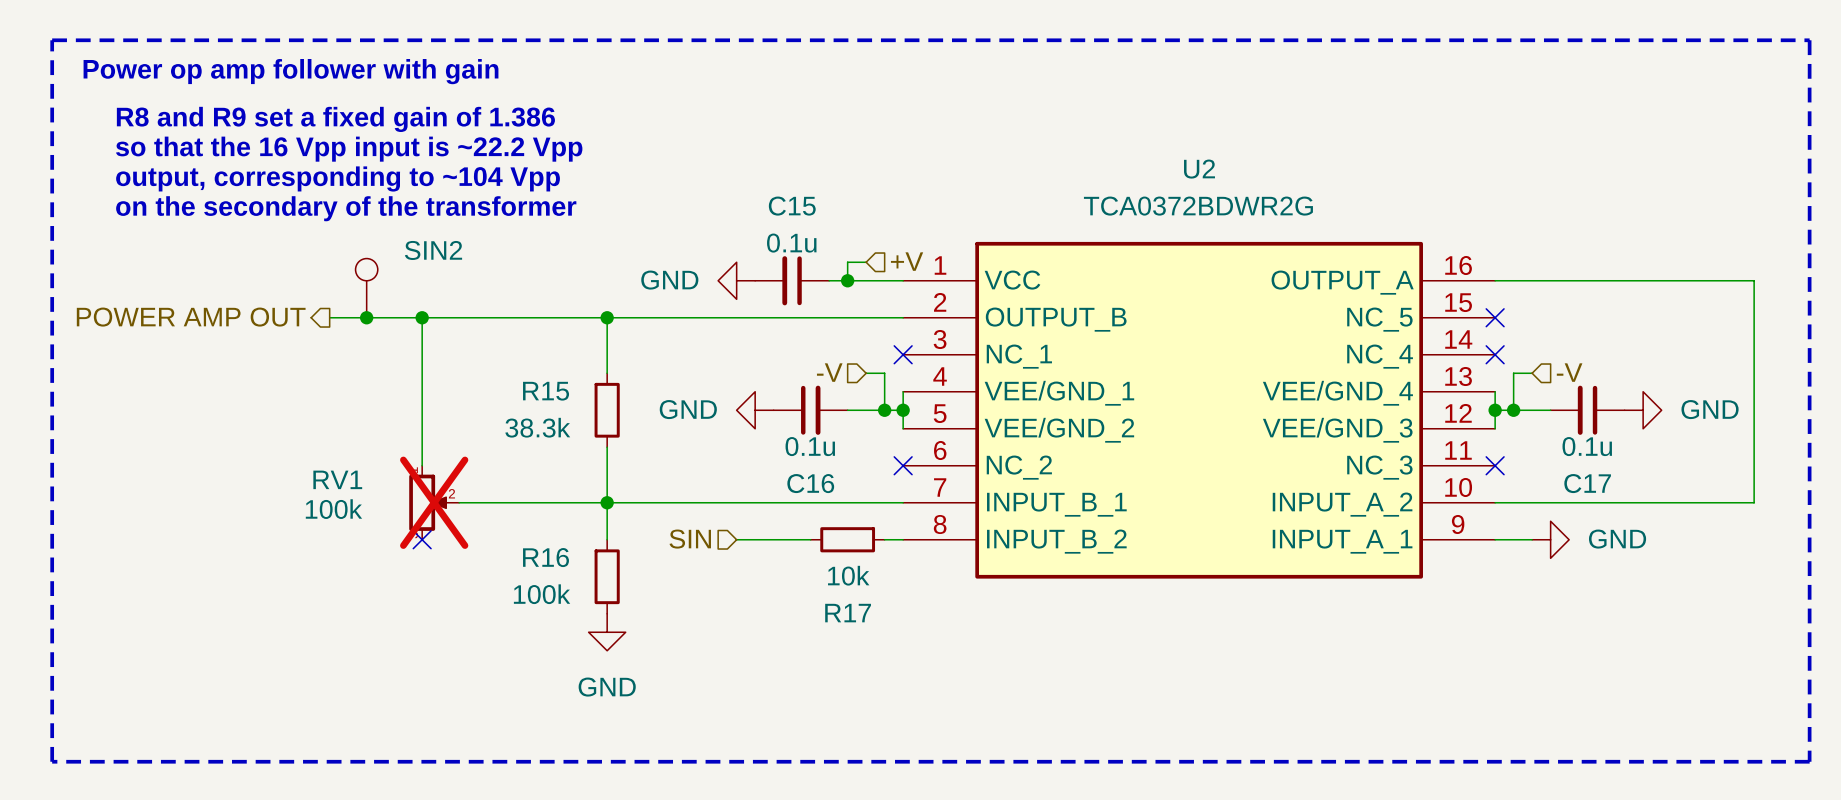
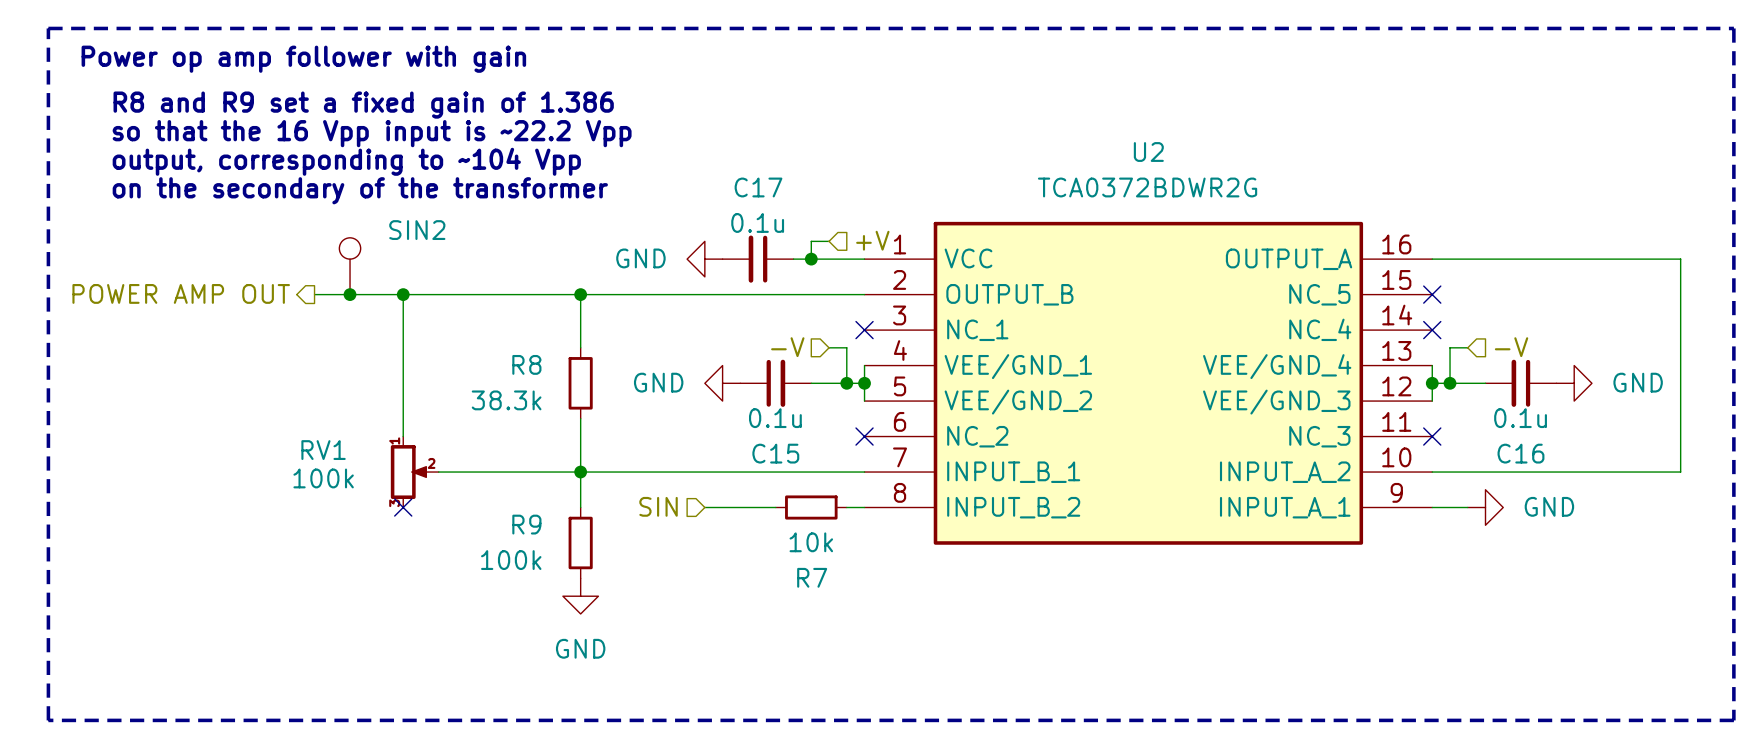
C15 name: C15 (792, 206) -> C17 (758, 187)
R15 name: R15 (546, 391) -> R8 (526, 364)
C16 name: C16 (810, 483) -> C15 (775, 453)
C17 name: C17 (1587, 483) -> C16 (1520, 453)
RV1 do-not-place cross: (434, 502) -> none
R16 name: R16 (546, 557) -> R9 (526, 524)
R17 name: R17 (848, 613) -> R7 (812, 577)

